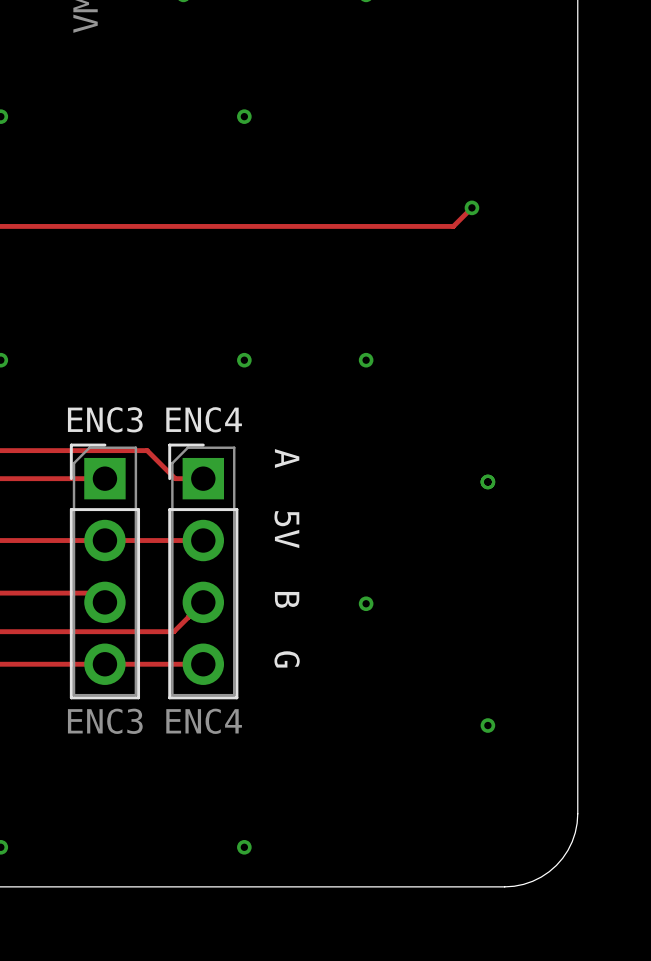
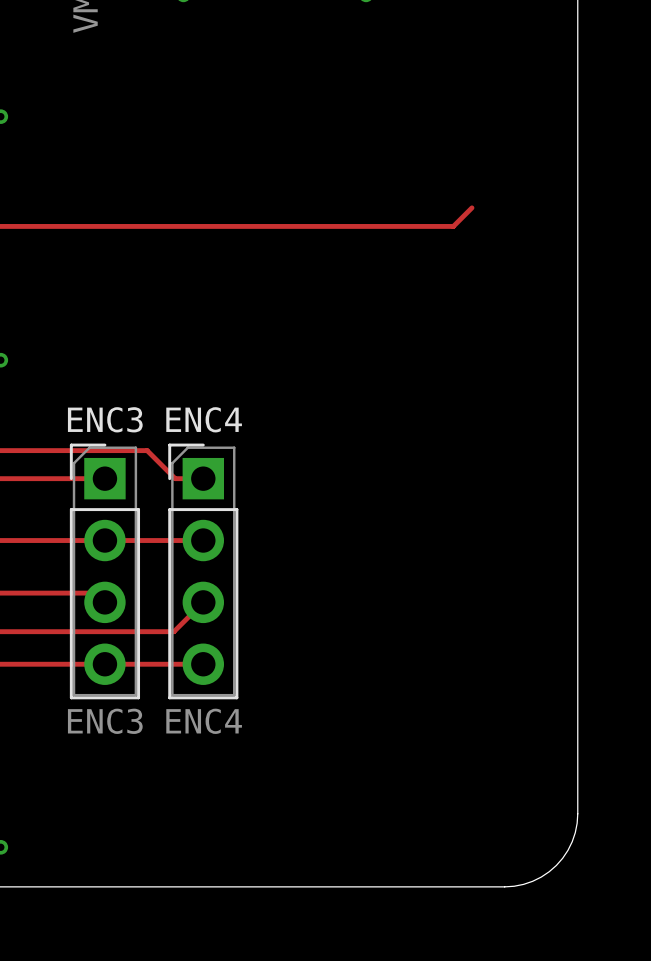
via: (244, 116) -> none
via: (471, 207) -> none
via: (244, 360) -> none
via: (366, 360) -> none
via: (487, 481) -> none
text: A 5V B G (287, 558) -> none
via: (366, 603) -> none
via: (487, 725) -> none
via: (244, 847) -> none

